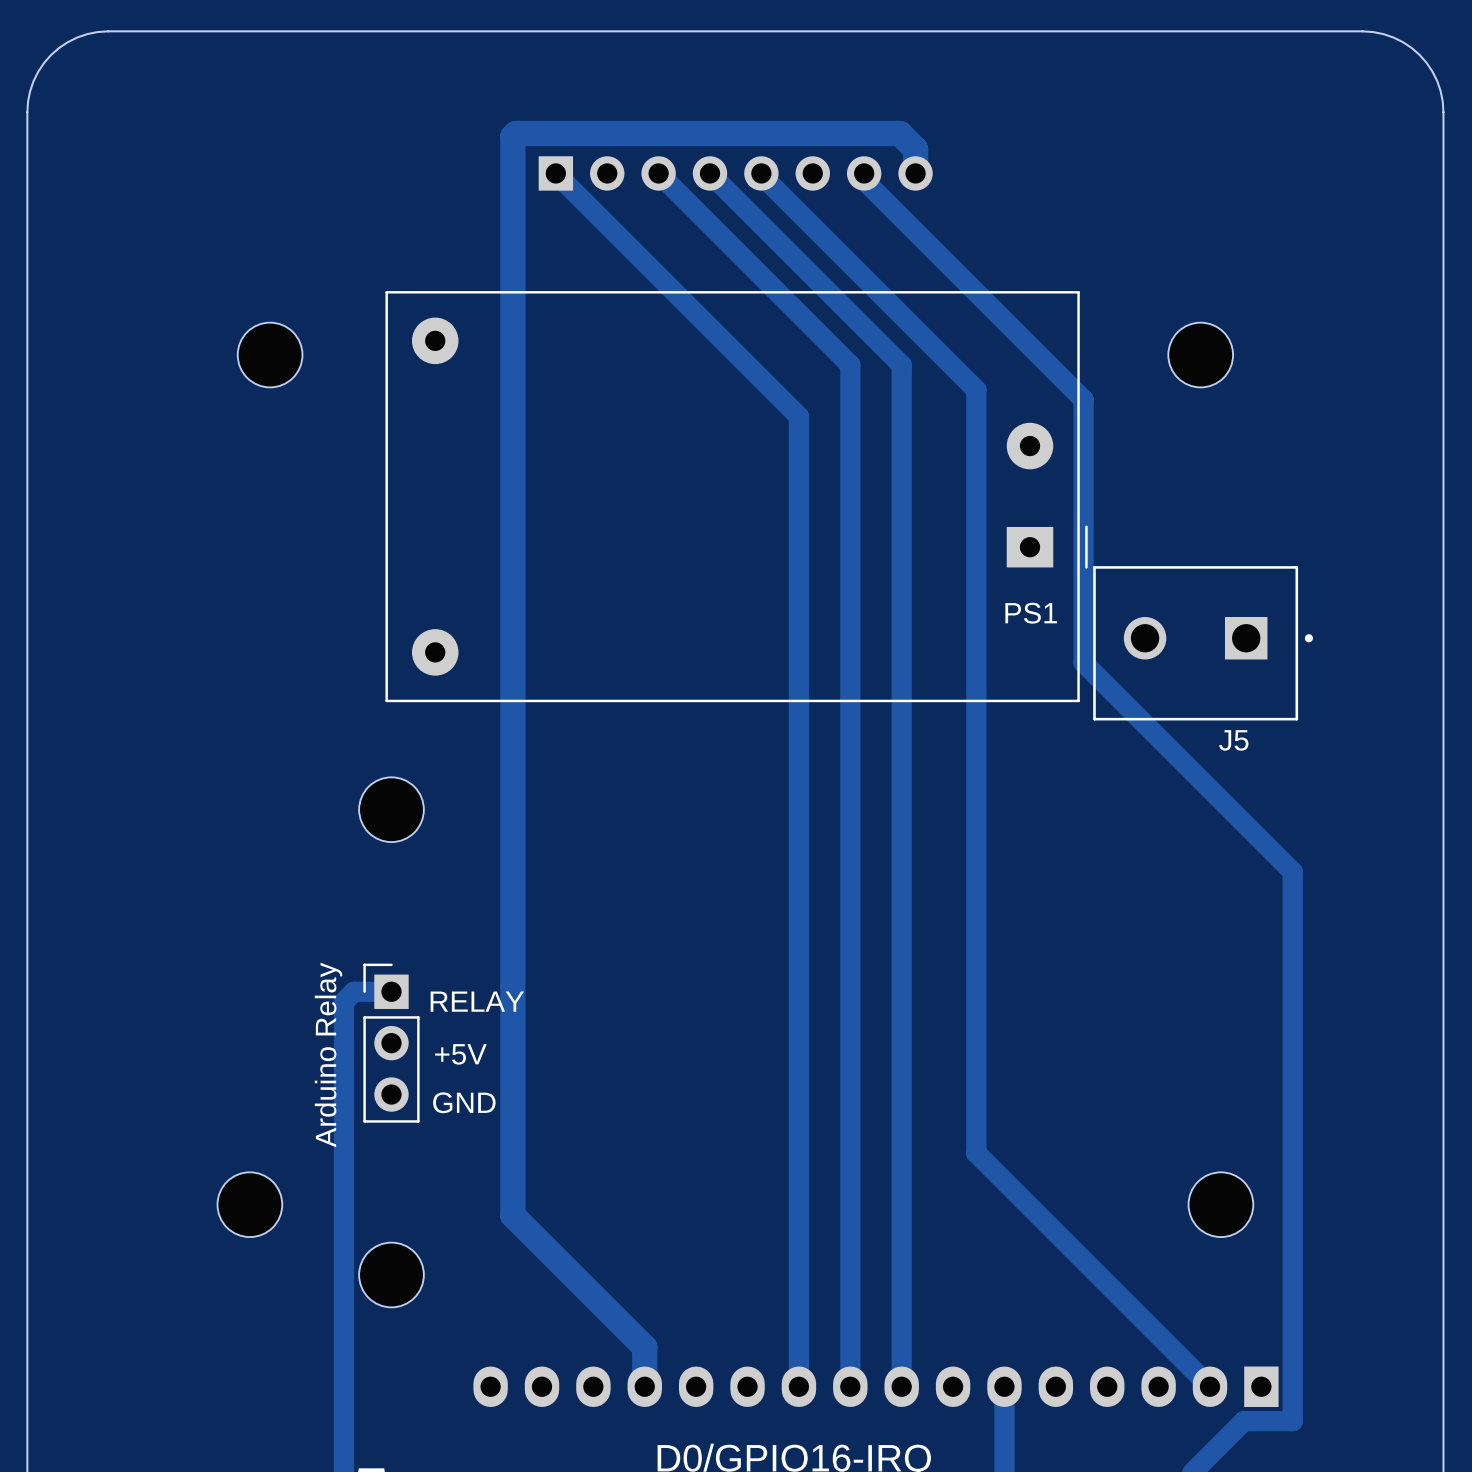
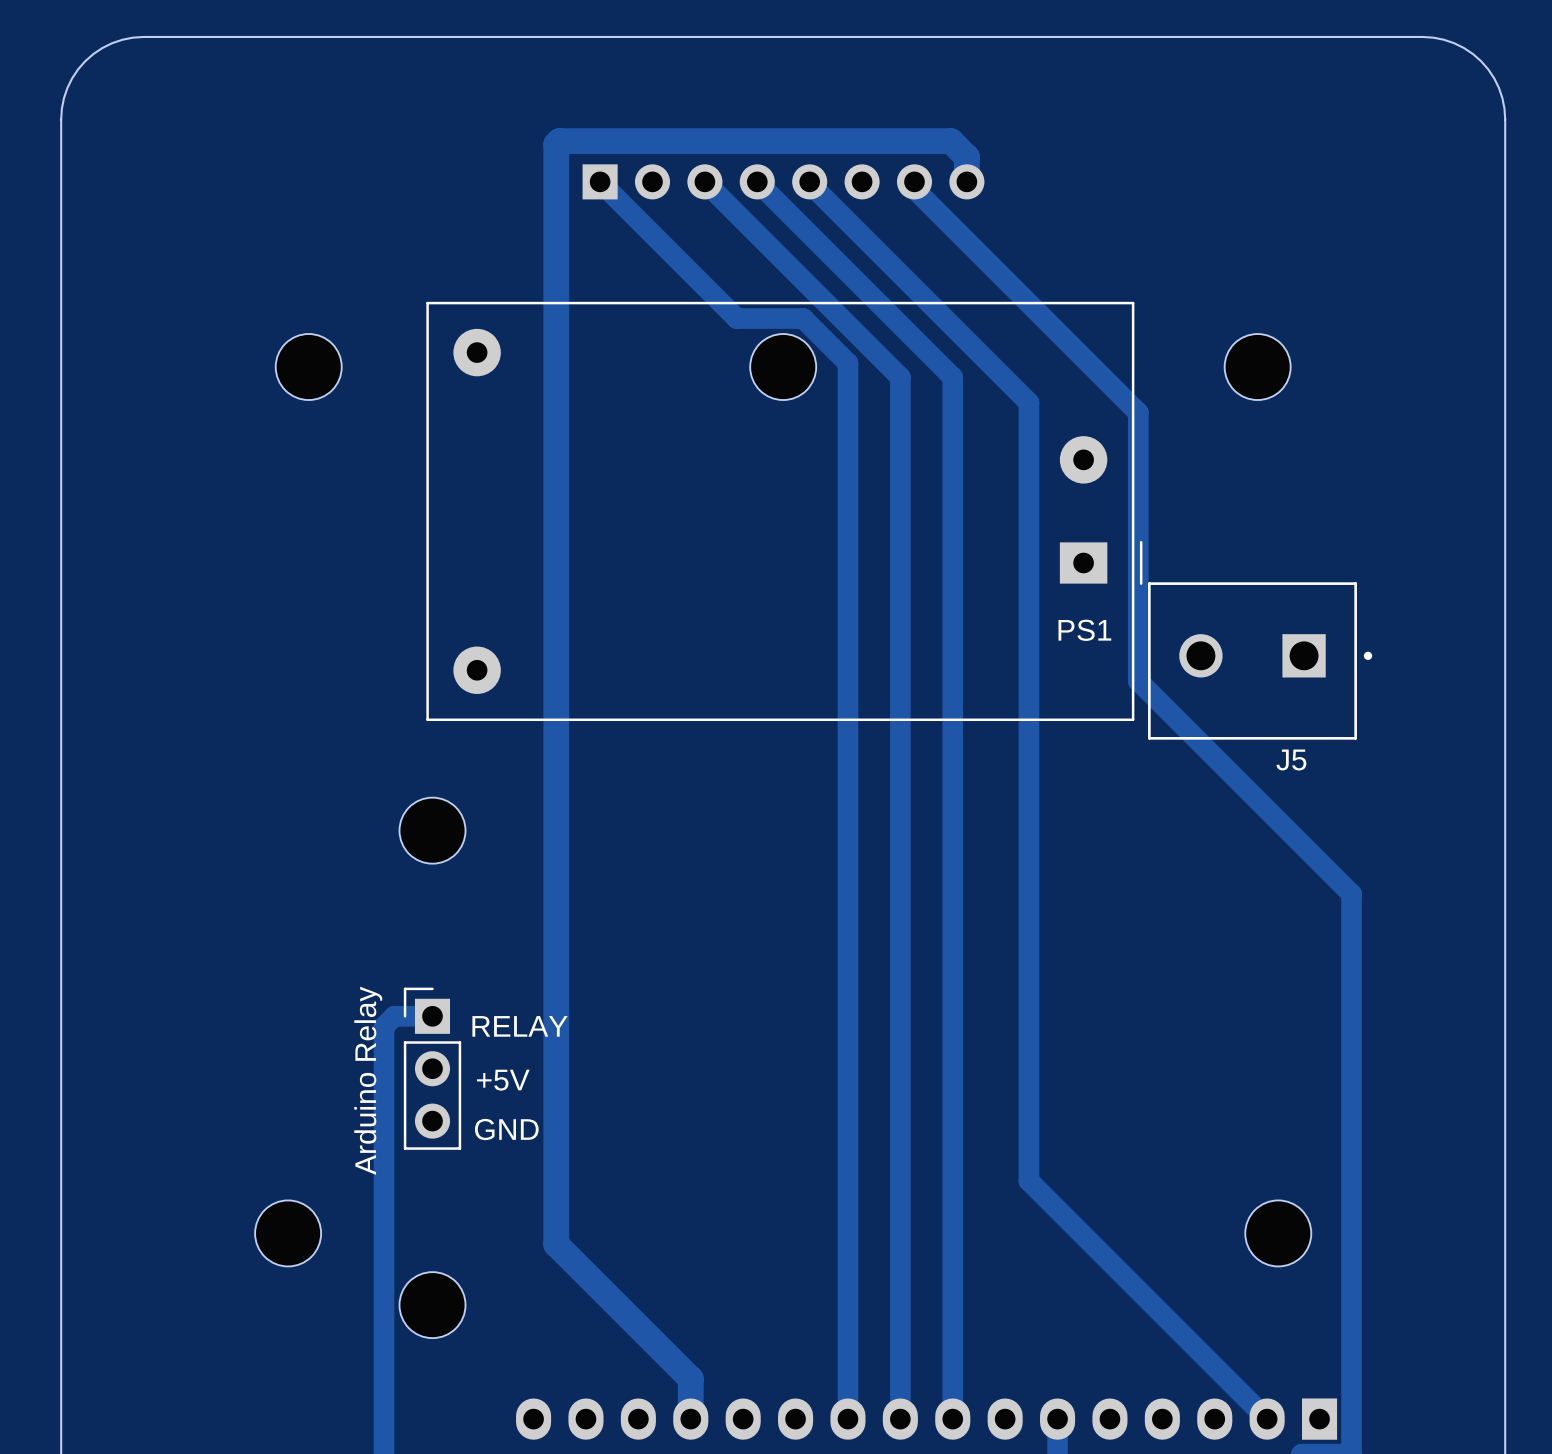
track: (689, 307) (798, 416) -> (736, 318) (803, 318) (847, 363) (847, 429)
part: none -> (783, 367)

